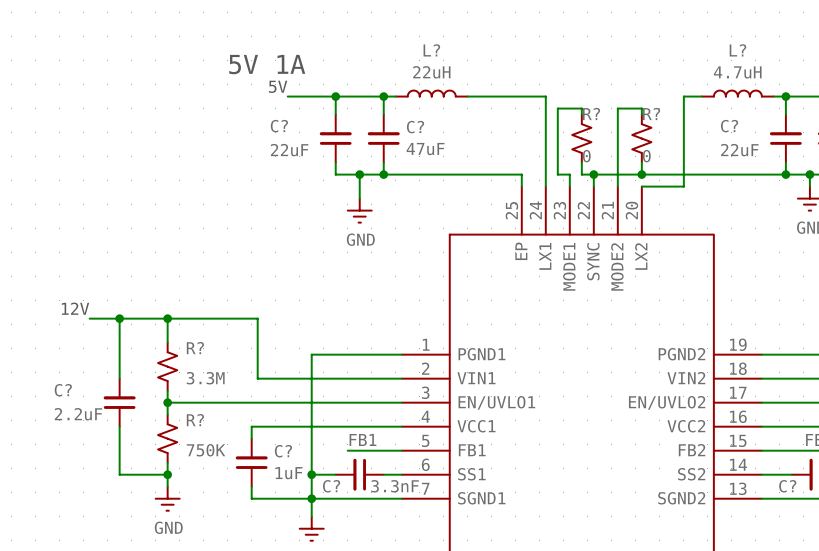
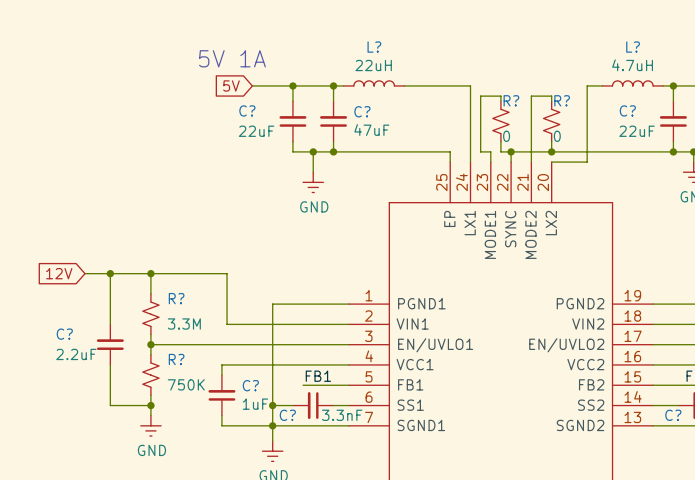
text: 5V (278, 86) -> none
global label: none -> 5V (231, 85)
text: 12V (75, 308) -> none
global label: none -> 12V (59, 273)

